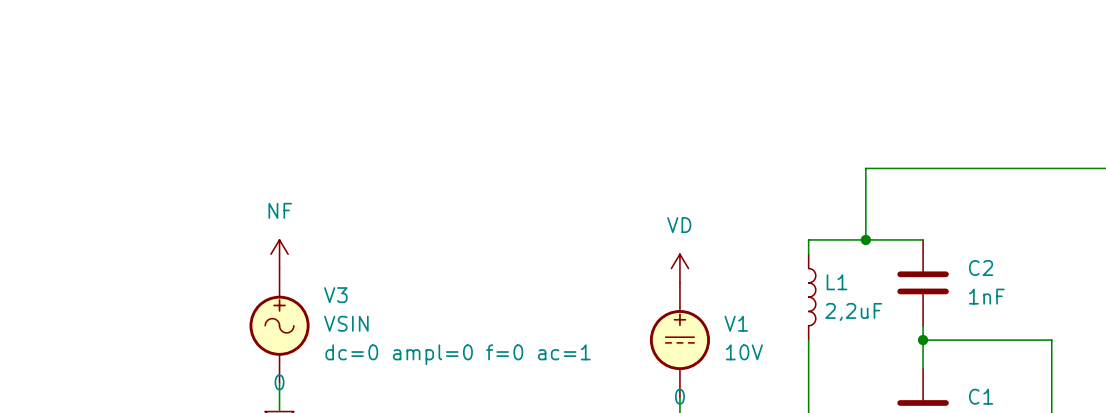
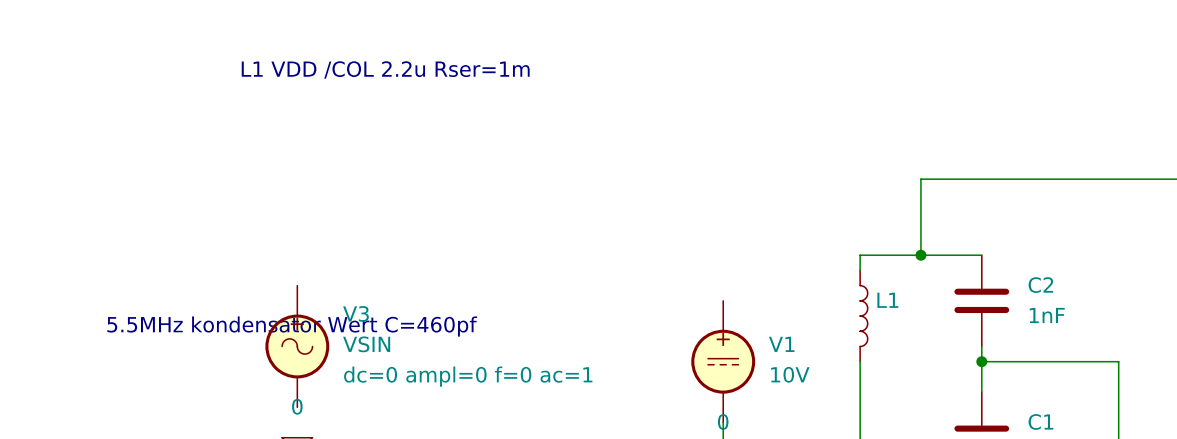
text: none -> L1 VDD /COL 2.2u Rser=1m (385, 69)
power symbol: NF (279, 254) -> none
power symbol: VD (679, 268) -> none
text: none -> 5.5MHz kondensator Wert C=460pf (292, 326)
L1 value: 2,2uF (853, 311) -> none
wire: (279, 382) (279, 411) -> none

